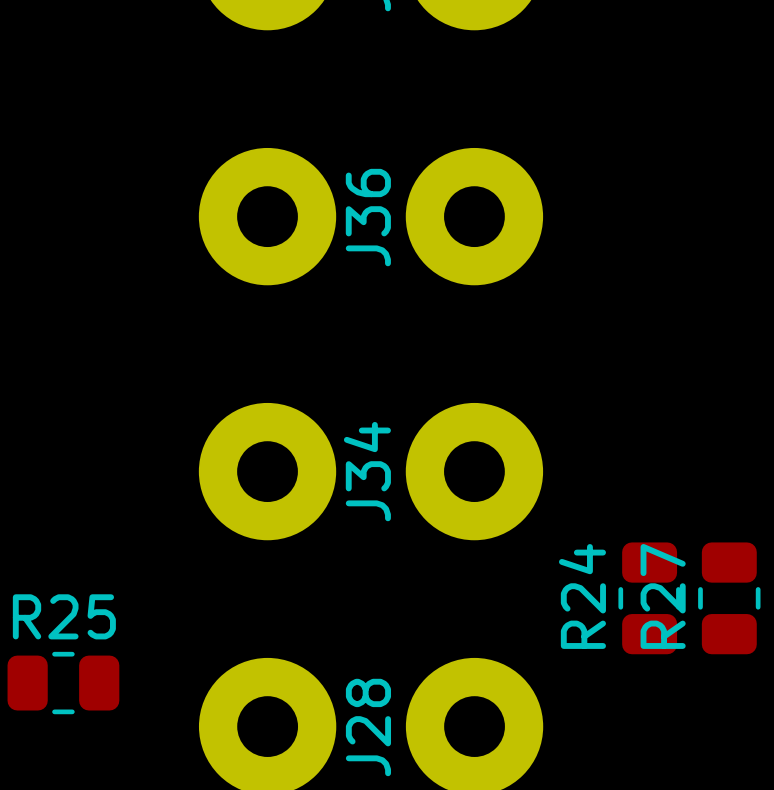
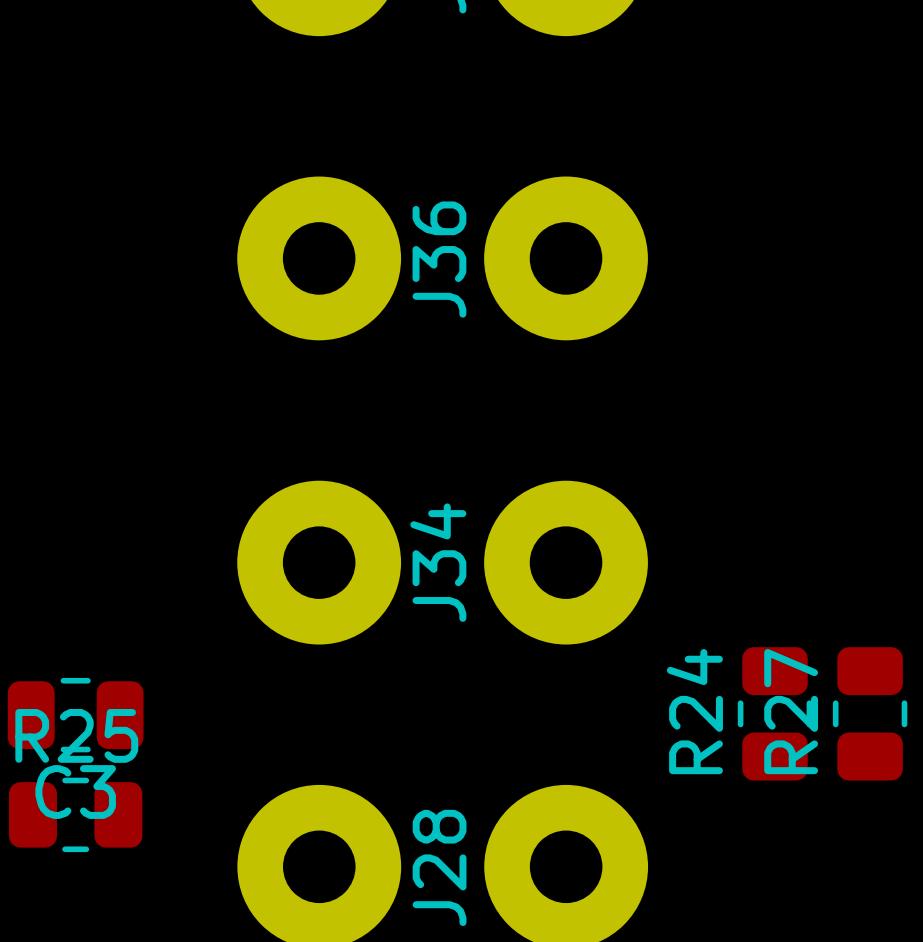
C3: none -> (75, 715)

